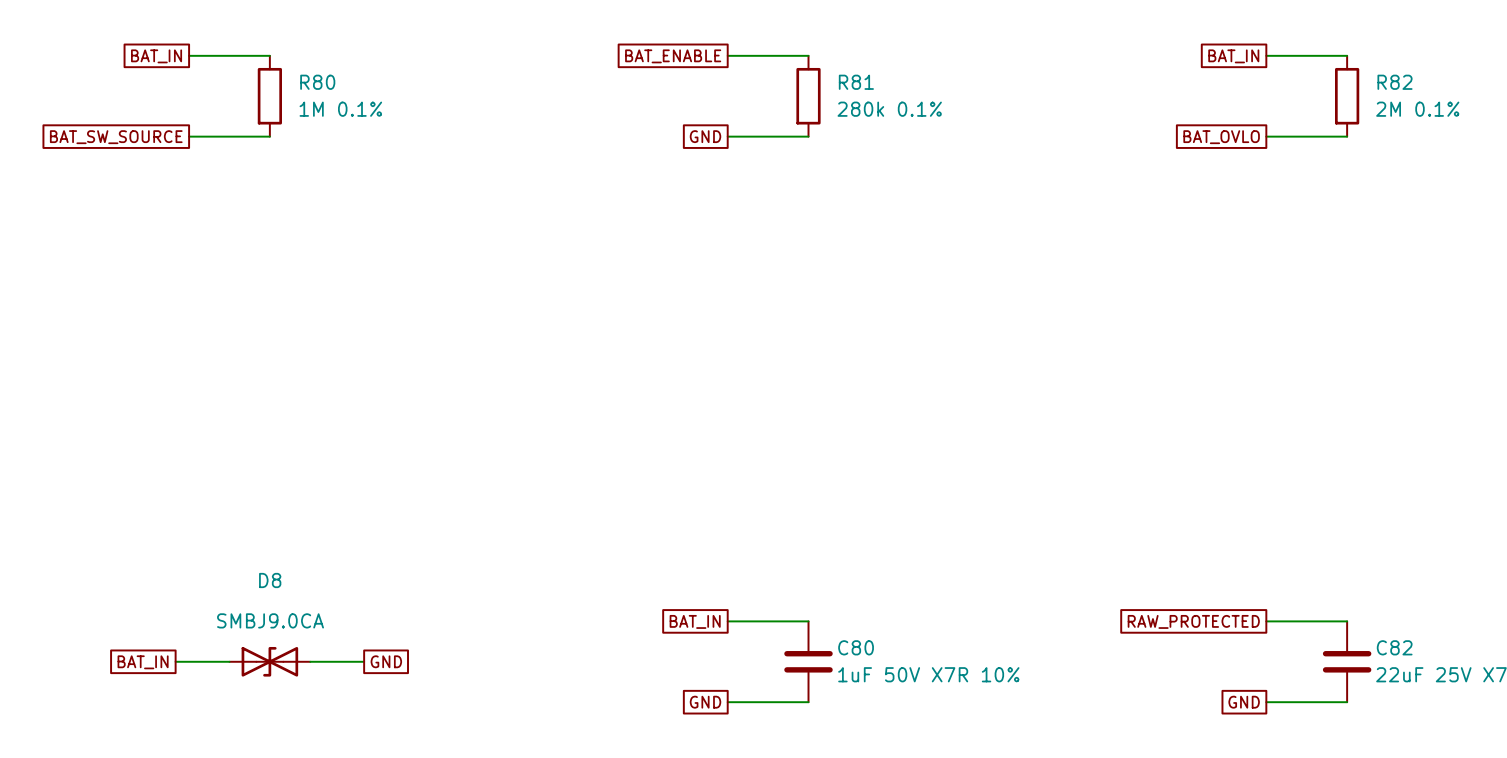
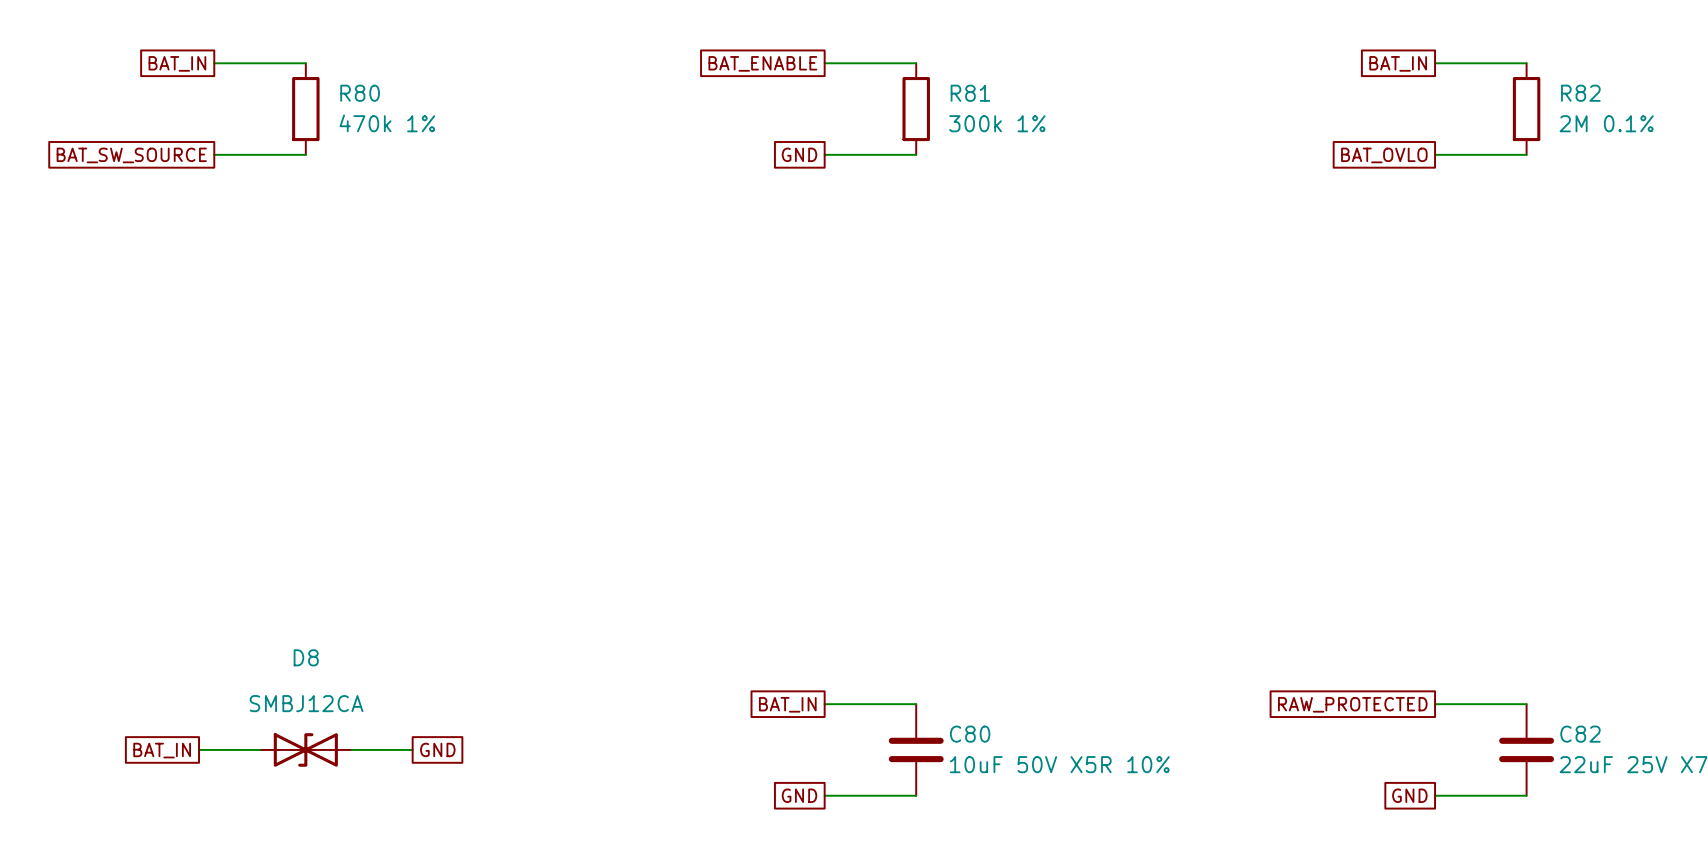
R80 value: 1M 0.1% (340, 109) -> 470k 1% (387, 123)
R81 value: 280k 0.1% (889, 109) -> 300k 1% (997, 123)
D8 value: SMBJ9.0CA (270, 620) -> SMBJ12CA (306, 703)
C80 value: 1uF 50V X7R 10% (928, 674) -> 10uF 50V X5R 10% (1059, 764)

